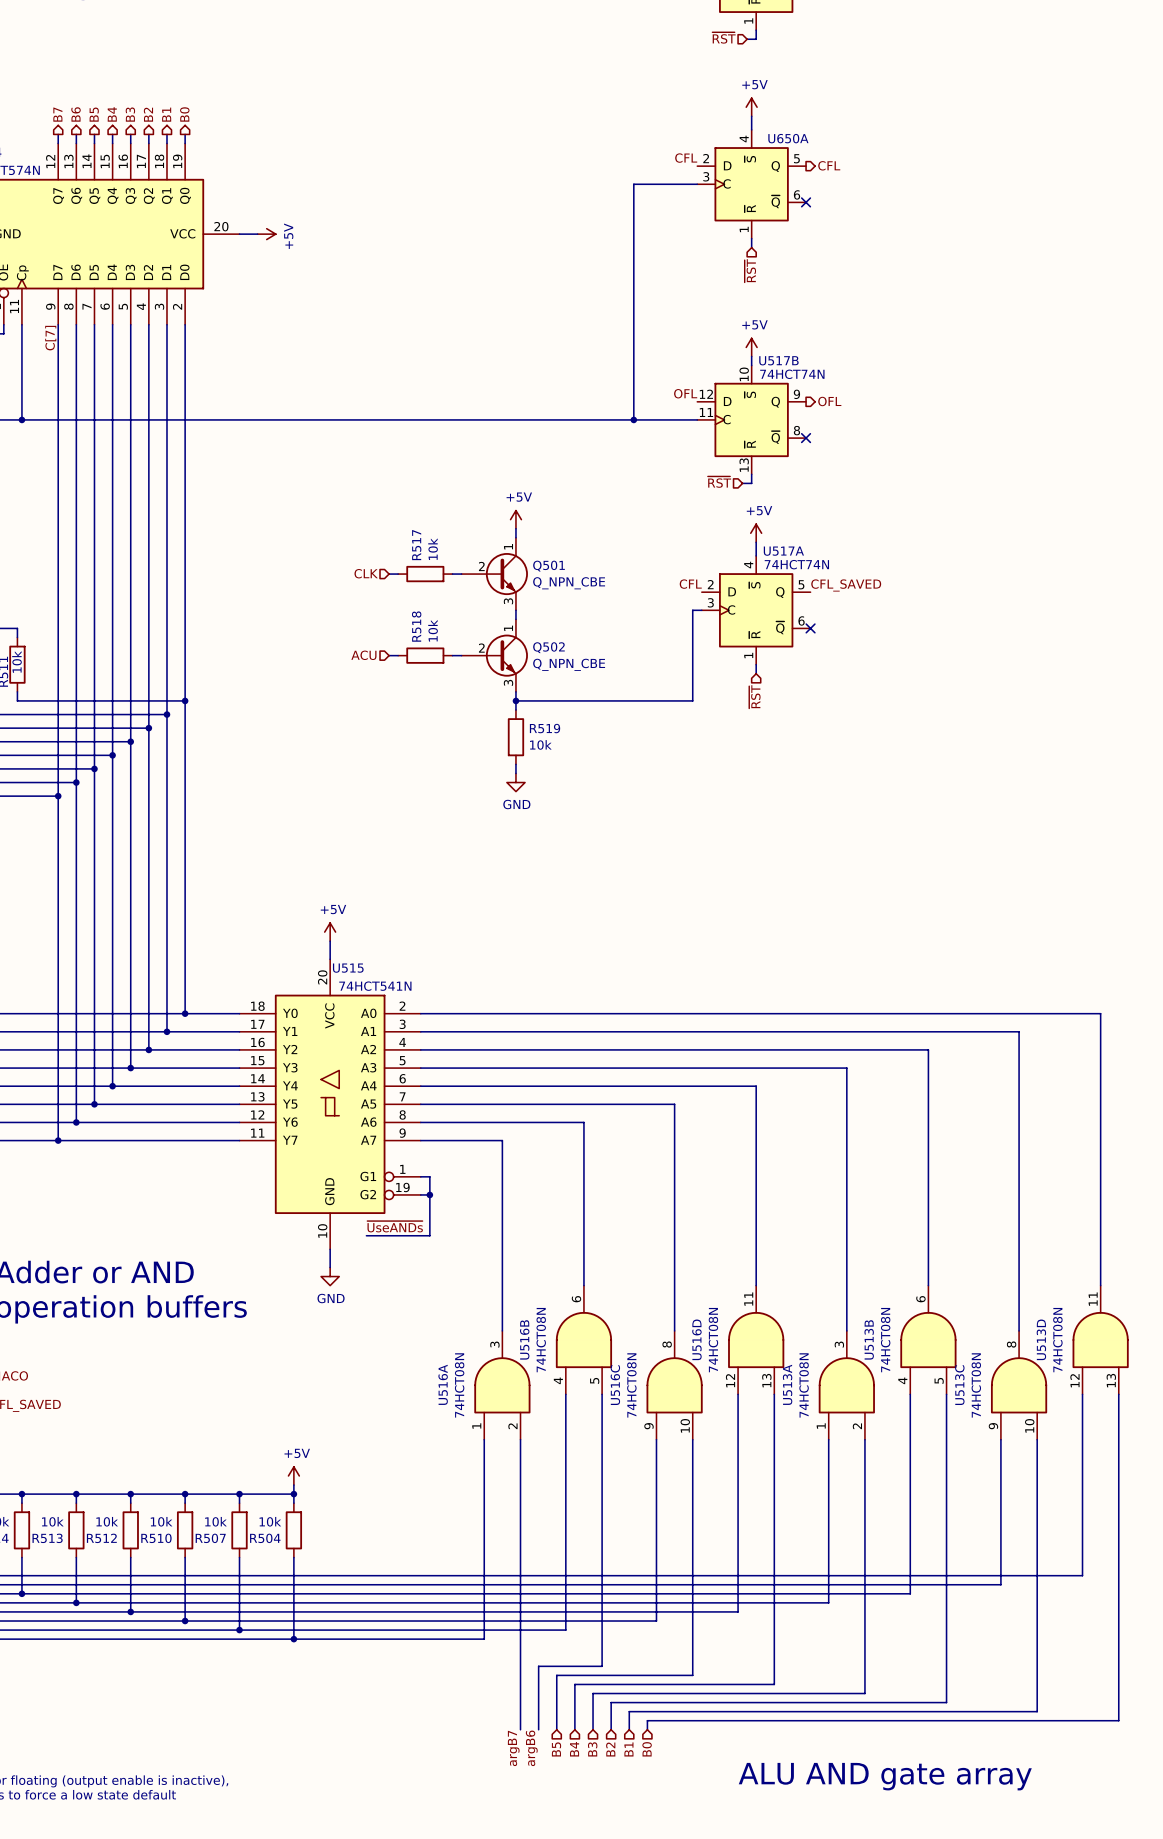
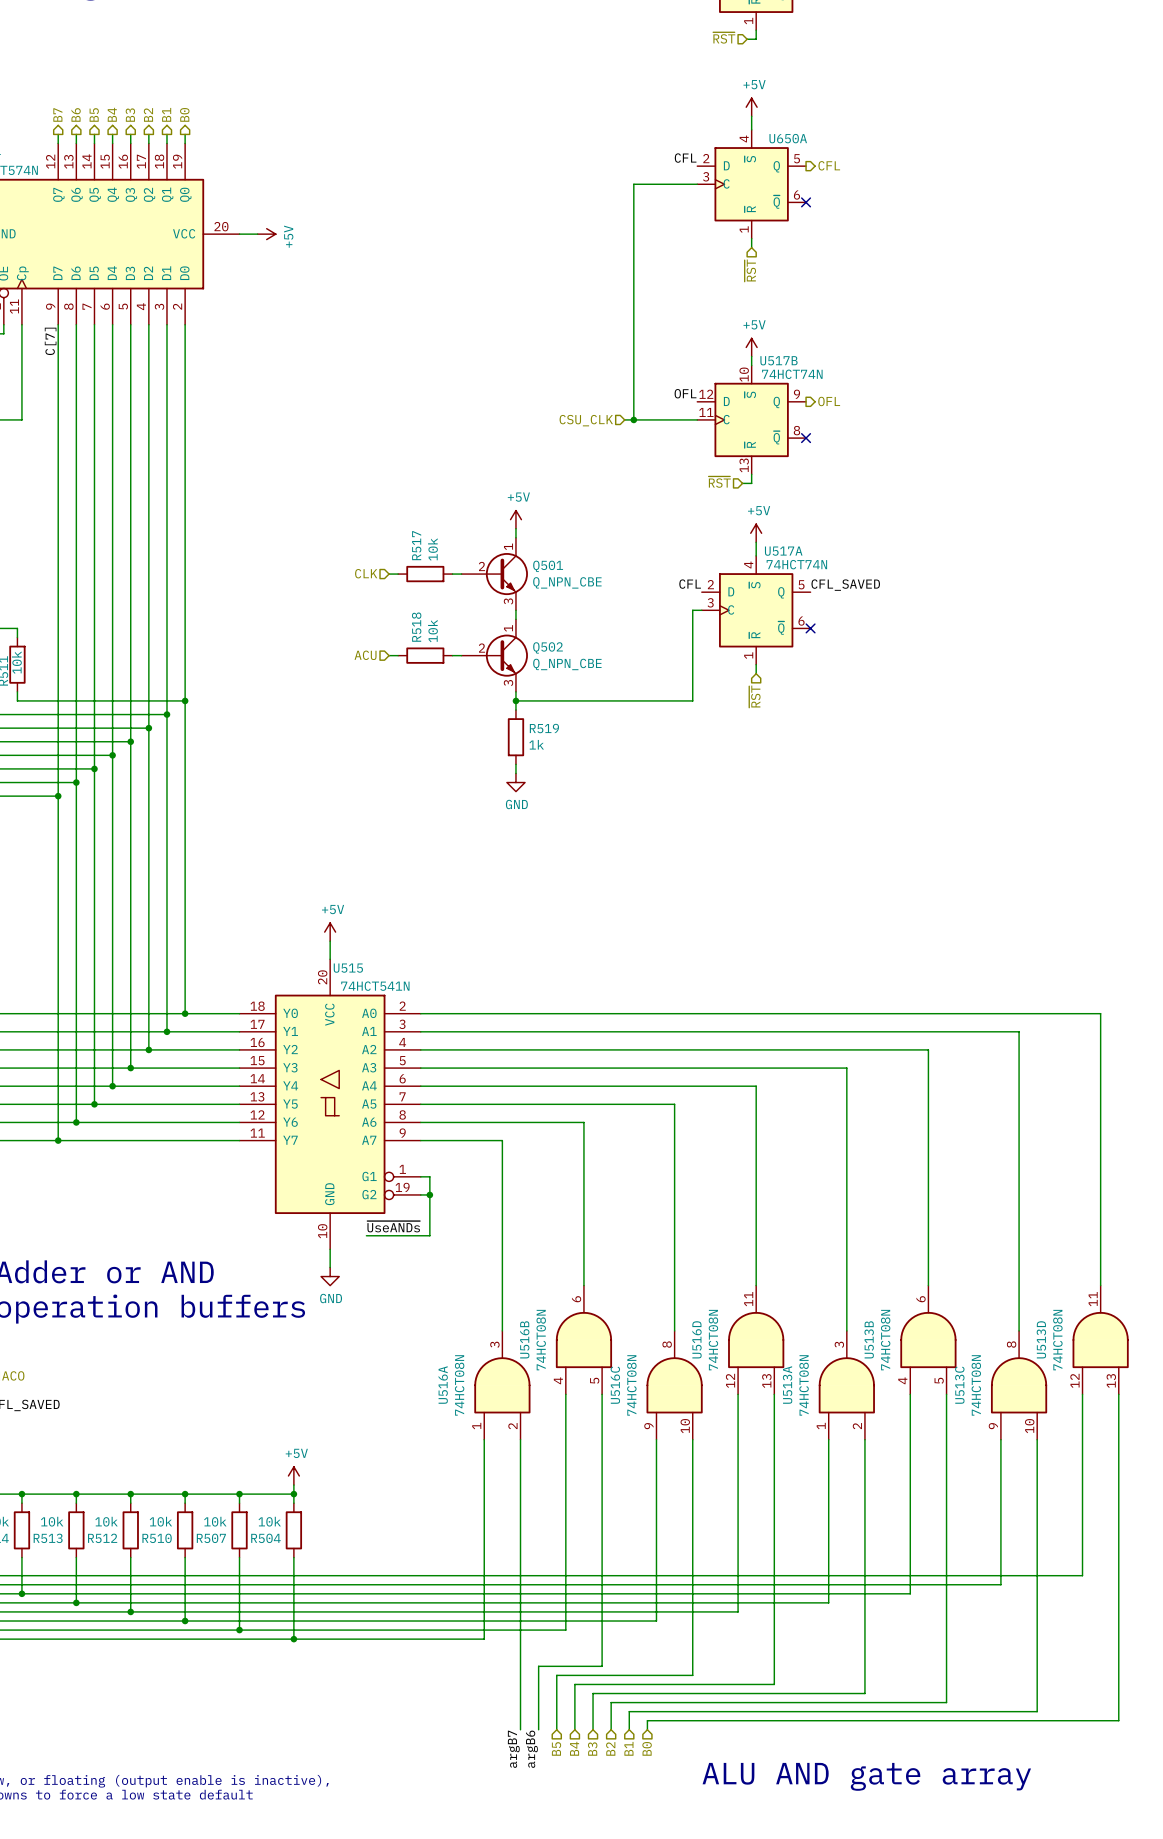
wire: (21, 419) (624, 419) -> none
junction: (21, 419) -> none
hierarchical label: none -> CSU_CLK (586, 420)
R519 value: 10k (540, 744) -> 1k (536, 744)

